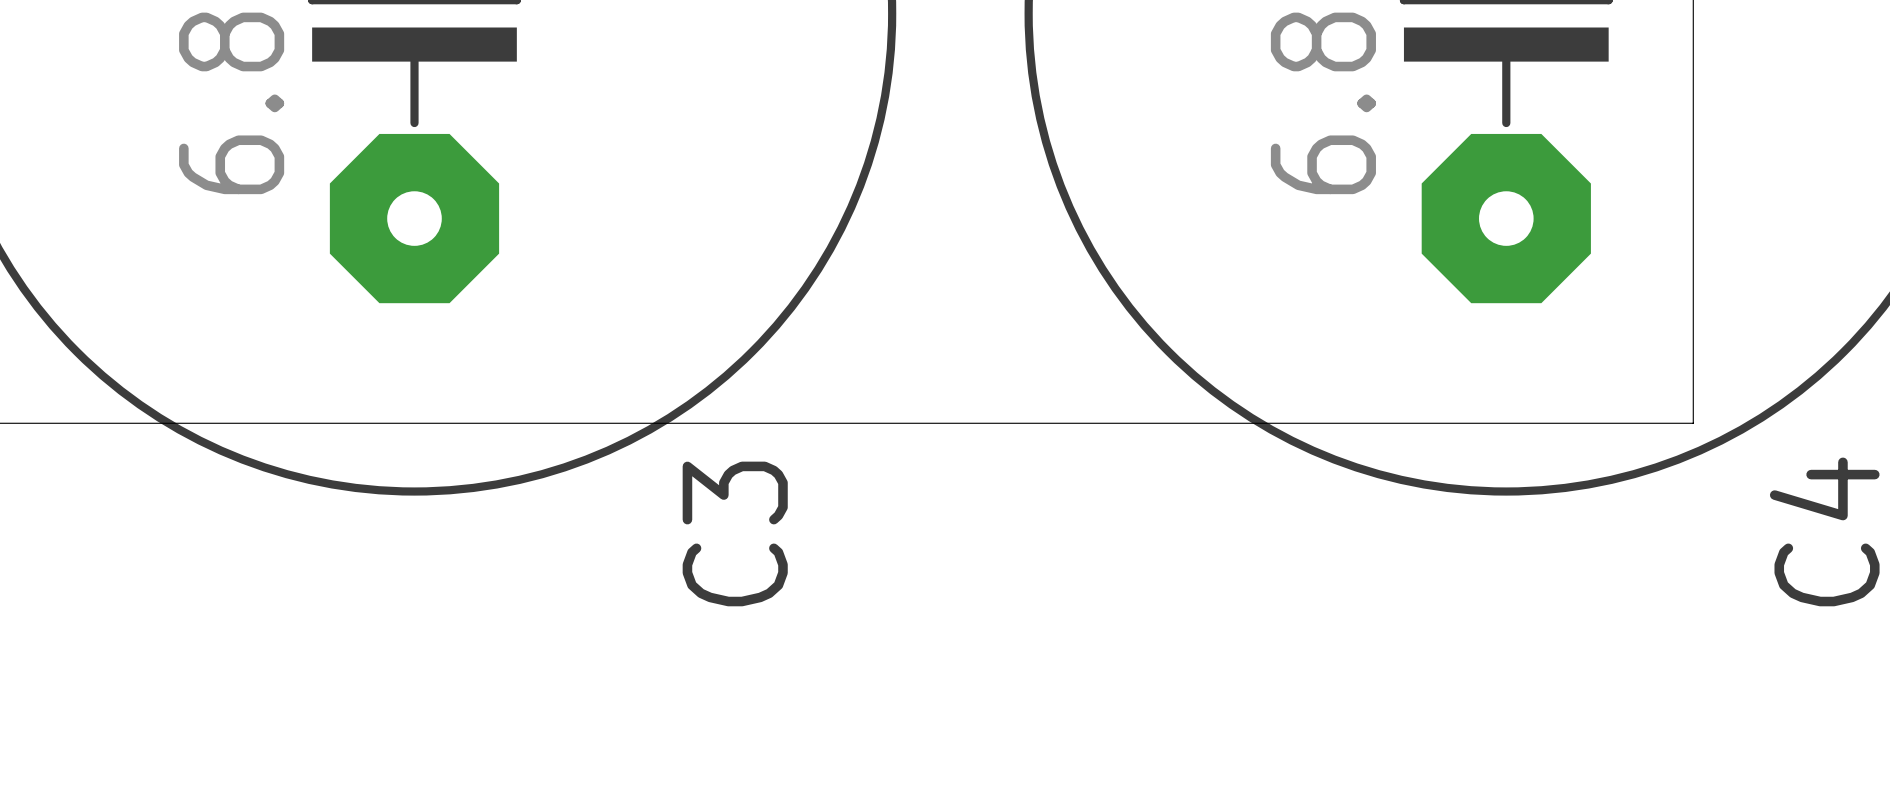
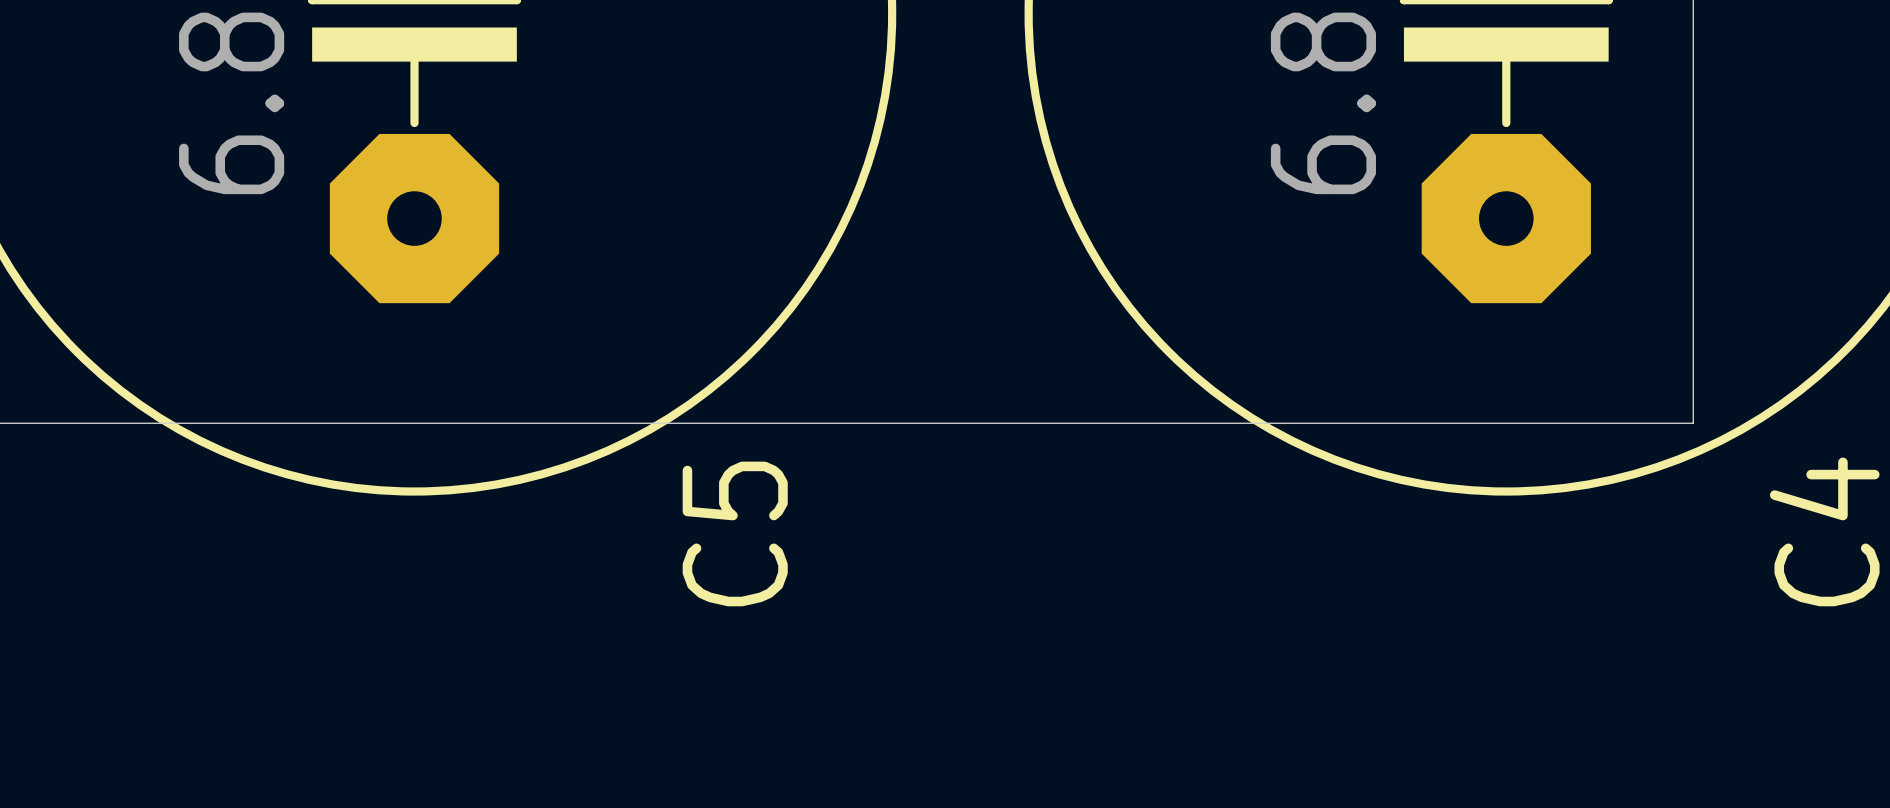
C3 name: C3 (735, 533) -> C5 (735, 533)

